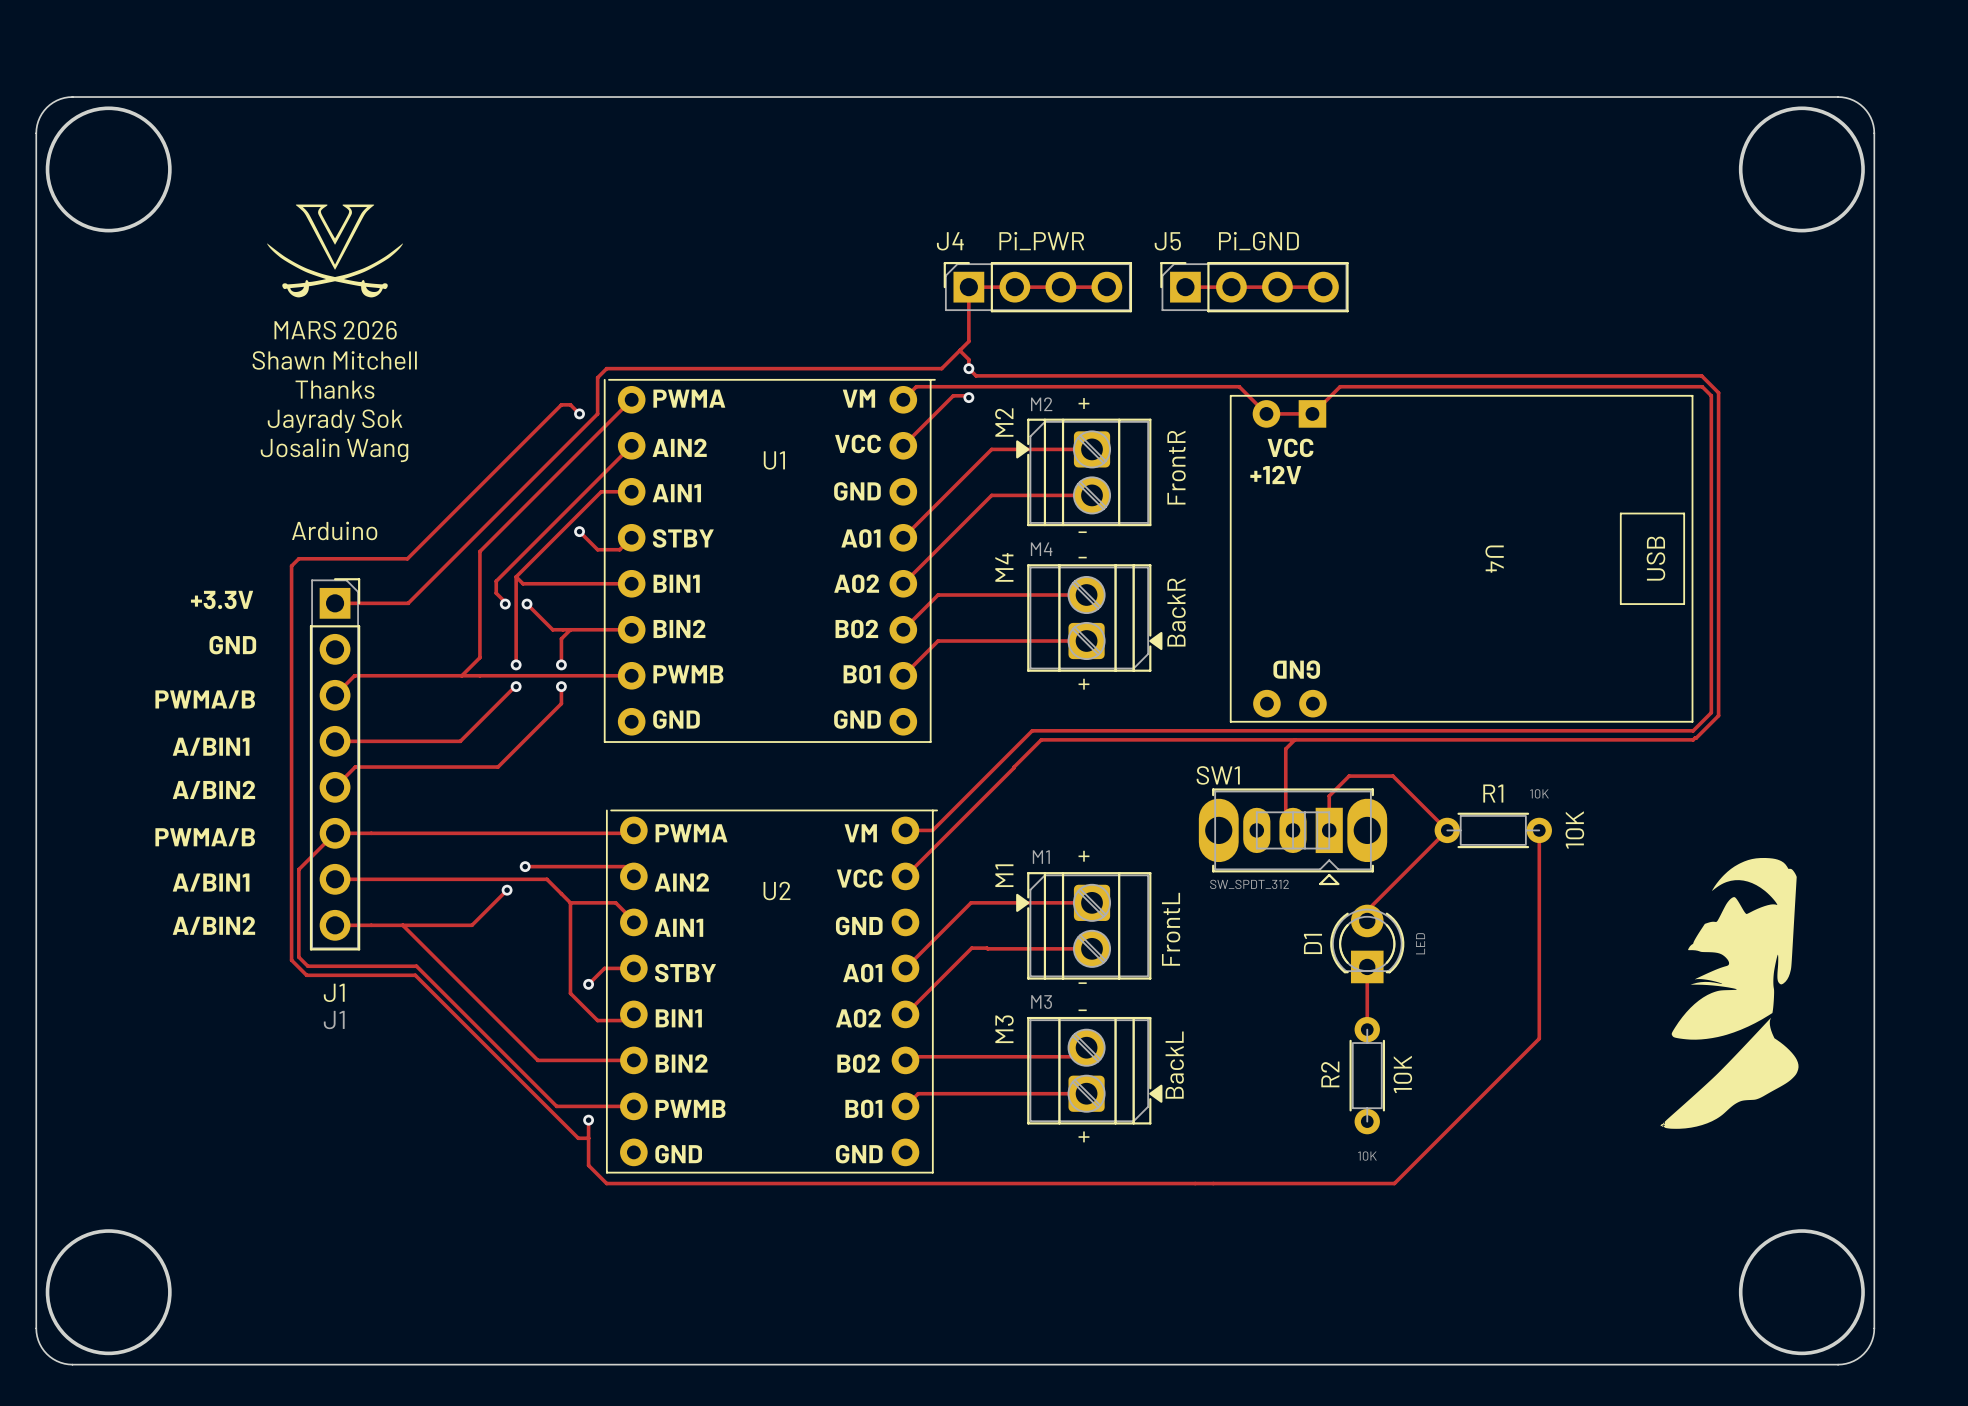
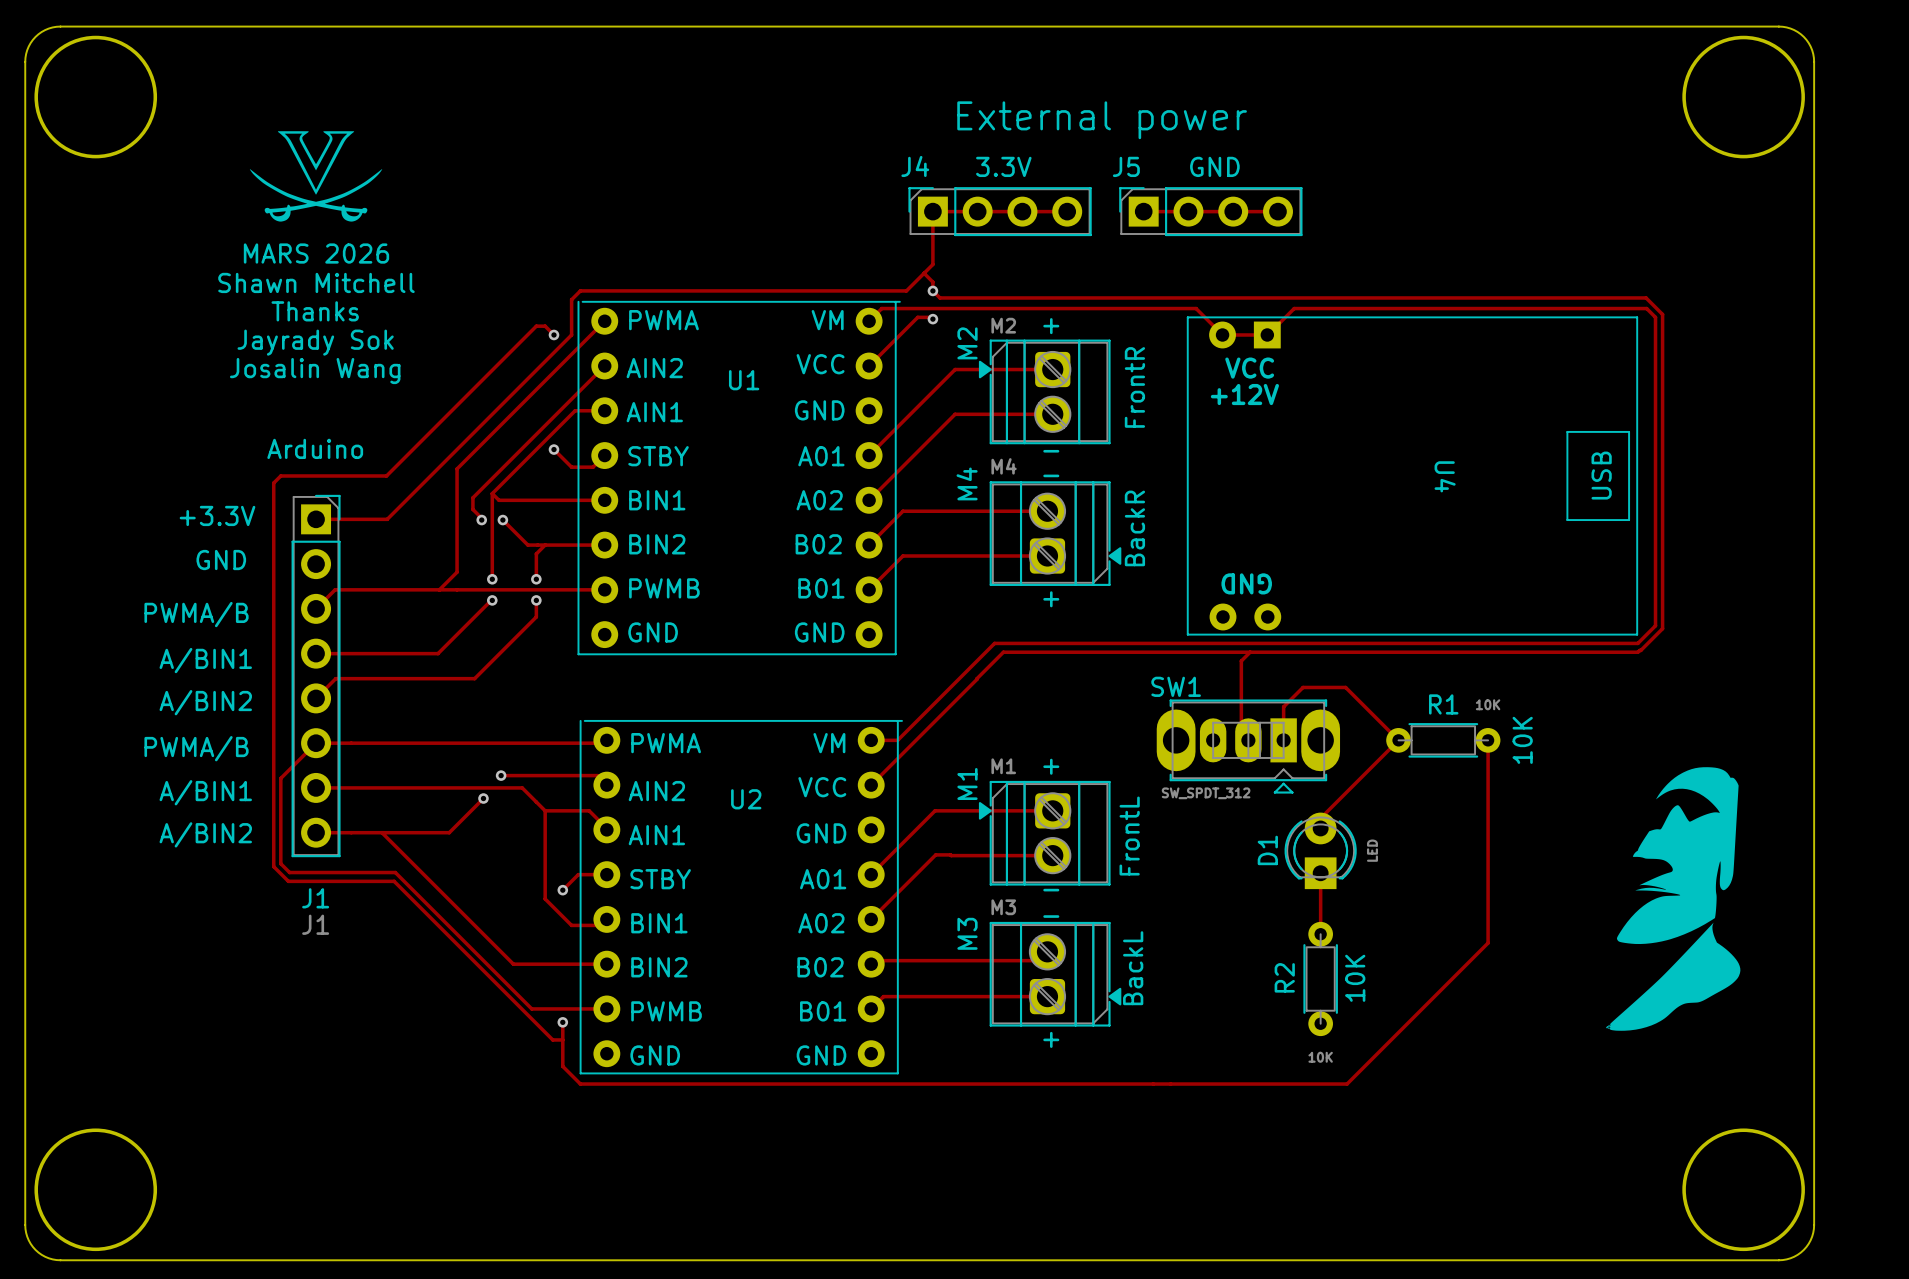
text: none -> External power (1102, 120)
J4 value: Pi_PWR (1041, 241) -> 3.3V (1003, 166)
J5 value: Pi_GND (1258, 241) -> GND (1214, 166)

